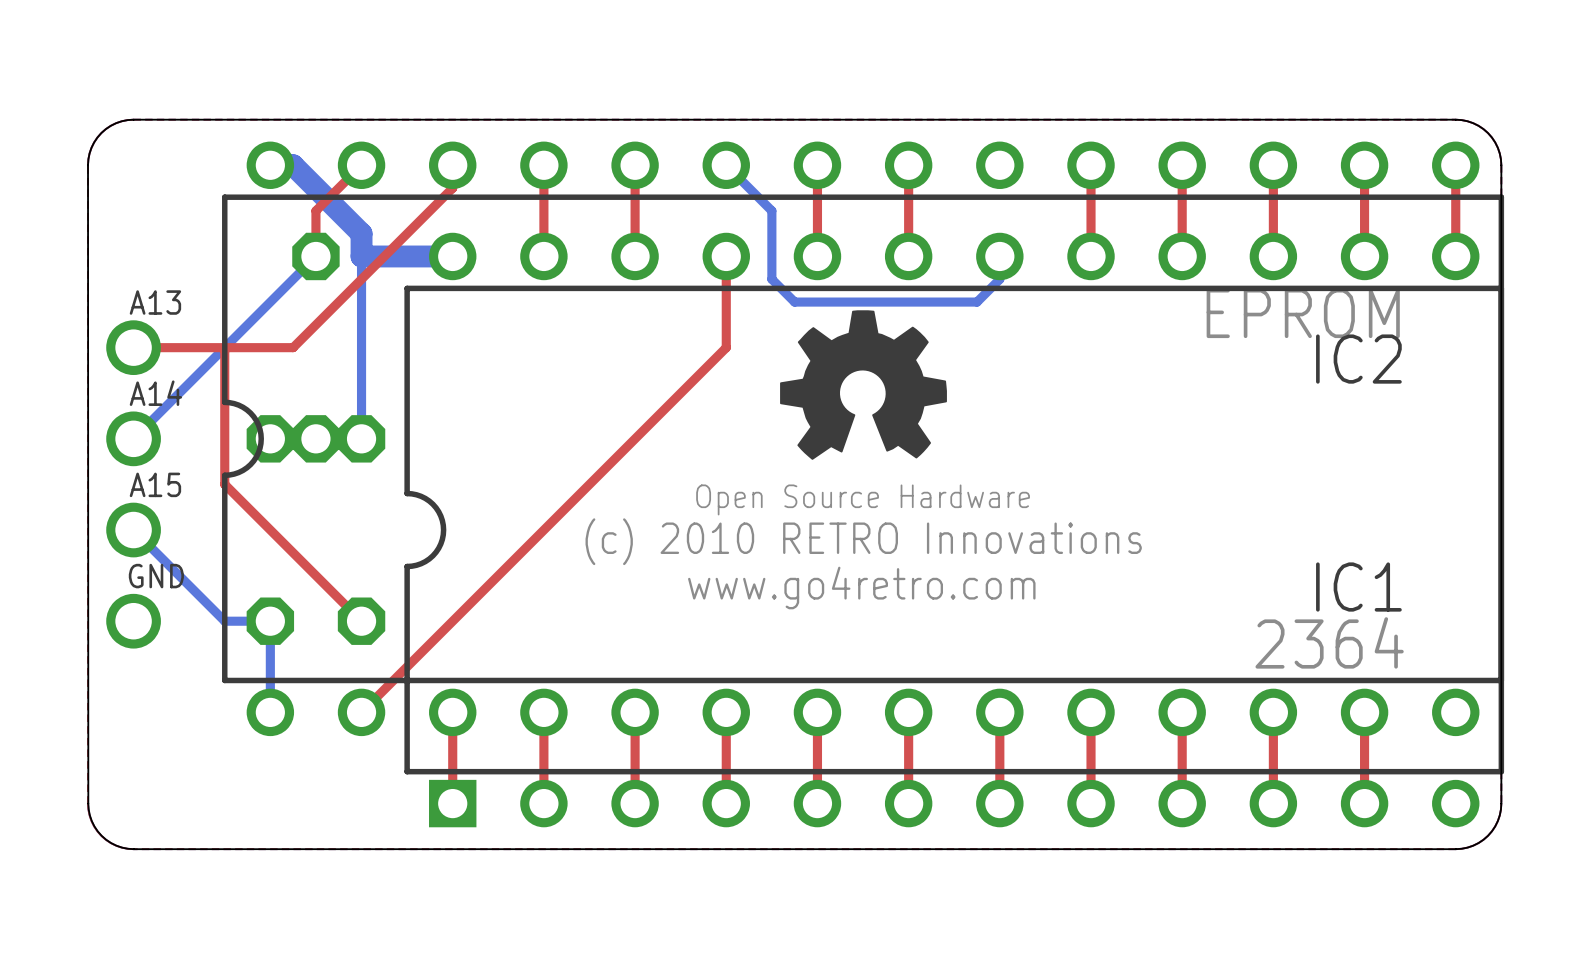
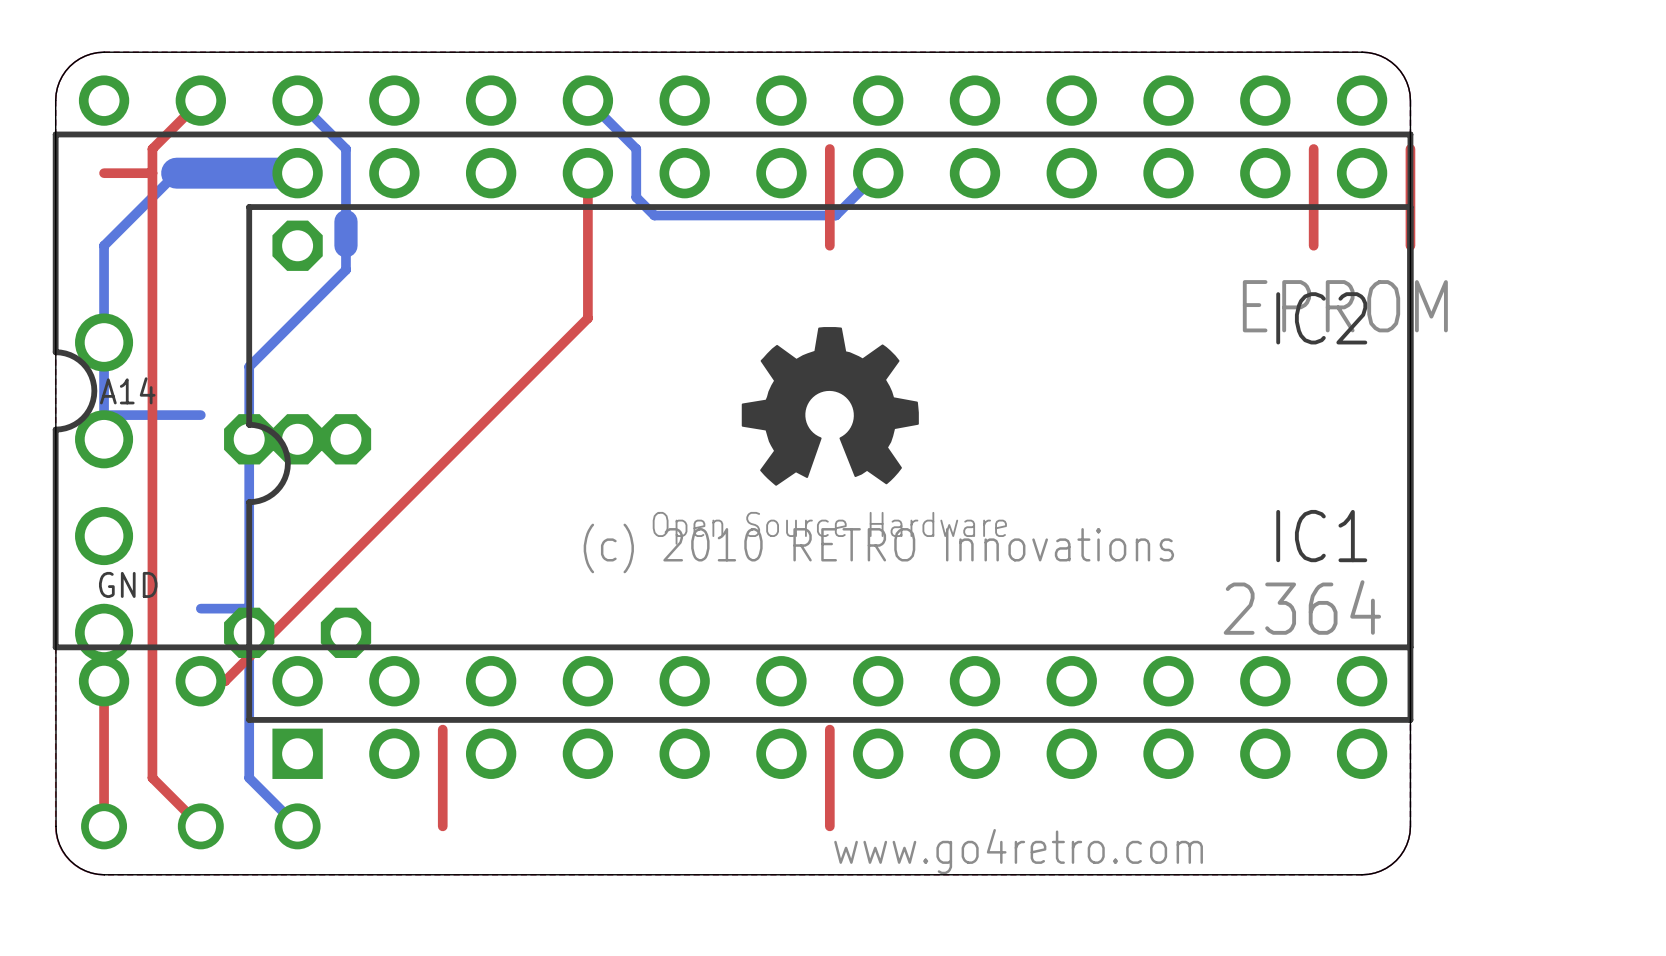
top track: none -> (200, 100) (152, 148) (152, 777) (200, 826)
bottom track: none -> (587, 100) (636, 148) (636, 197) (654, 215) (835, 215) (878, 173)
board edge: (88, 165) (91, 147) (101, 133) (116, 123) (133, 119) (1455, 119) (1467, 121) (1478, 125) (1487, 133) (1495, 142) (1499, 153) (1501, 165) (1501, 803) (1499, 815) (1495, 826) (1483, 839) (1473, 845) (1461, 848) (1318, 849) -> (55, 148) (55, 100) (59, 82) (65, 71) (74, 62) (85, 55) (97, 52) (1362, 52) (1374, 53) (1386, 58) (1396, 66) (1403, 76) (1408, 88) (1410, 100) (1410, 826) (1406, 844) (1396, 860) (1380, 871) (1362, 874)
bottom track: (270, 165) (293, 165) (361, 233) -> (297, 100) (345, 148) (345, 221)
top track: (361, 165) (315, 210) (315, 256) -> none
top track: (452, 165) (452, 188) (293, 347) (133, 347) -> none
top track: (543, 165) (543, 256) -> none
top track: (635, 165) (635, 256) -> none
bottom track: (726, 165) (771, 210) (771, 279) (794, 302) (977, 302) (999, 279) (999, 256) -> none
top track: (908, 165) (908, 256) -> none
top track: (1091, 165) (1091, 256) -> none
top track: (1182, 165) (1182, 256) -> none
top track: (1455, 165) (1455, 256) -> none
top track: none -> (104, 173) (152, 173)
bottom track: none -> (297, 173) (176, 173) (104, 245) (104, 415) (200, 415)
top track: none -> (587, 173) (587, 318) (225, 681) (200, 681)
bottom track: (315, 256) (133, 438) -> none
bottom track: (361, 256) (452, 256) -> none
top track: (726, 256) (726, 347) (361, 712) -> none
bottom track: (361, 279) (361, 438) (270, 438) -> (345, 269) (249, 366) (249, 632)
text: A13 (155, 302) -> none
top track: (224, 347) (224, 484) (361, 621) -> none
IC2 name position: IC2 (1358, 359) -> IC2 (1321, 318)
drawing position: (863, 385) -> (830, 406)
IC2 position: (863, 438) -> (733, 390)
text: A15 (155, 484) -> none
bottom track: (133, 530) (224, 621) (270, 621) -> none
IC1 position: (954, 530) -> (829, 463)
text position: www.go4retro.com (861, 587) -> www.go4retro.com (1018, 851)
IC1 name position: IC1 (1358, 587) -> IC1 (1321, 536)
bottom track: none -> (200, 608) (249, 608)
IC1 value position: 2364 (1329, 642) -> 2364 (1302, 607)
top track: none -> (104, 681) (104, 826)
bottom track: none -> (249, 729) (249, 777) (297, 826)
top track: (543, 712) (543, 803) -> none
top track: (635, 712) (635, 803) -> none
top track: (726, 712) (726, 803) -> none
top track: (908, 712) (908, 803) -> none
top track: (999, 712) (999, 803) -> none
top track: (1091, 712) (1091, 803) -> none
top track: (1182, 712) (1182, 803) -> none
top track: (1273, 712) (1273, 803) -> none
top track: (1364, 712) (1364, 803) -> none
via: none -> (104, 826)
via: none -> (200, 826)
via: none -> (297, 826)

